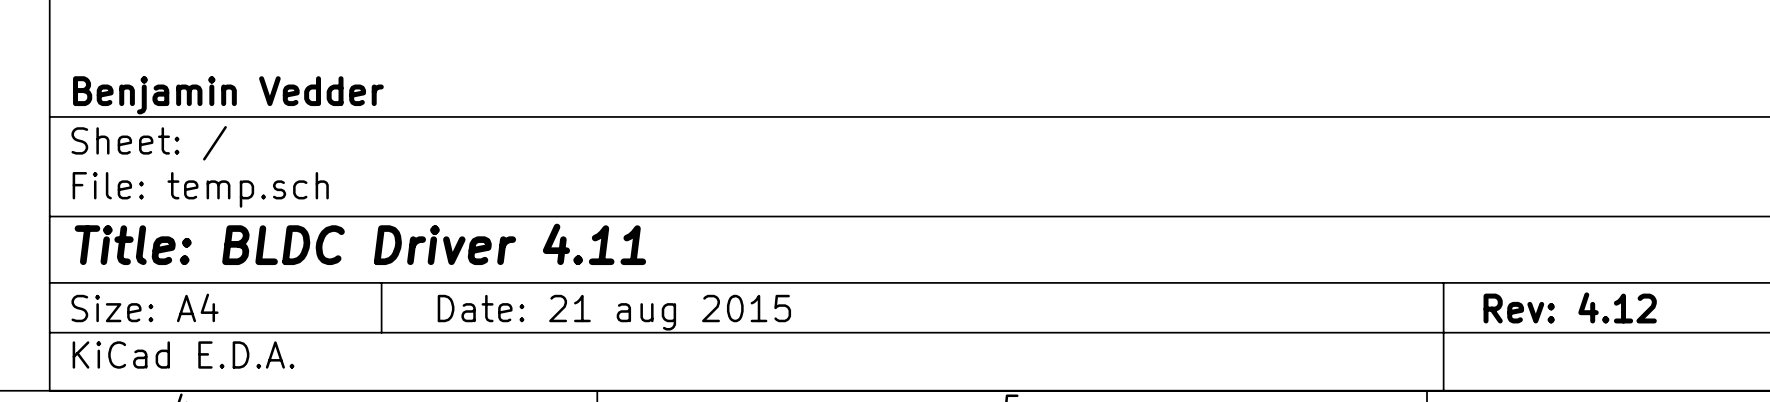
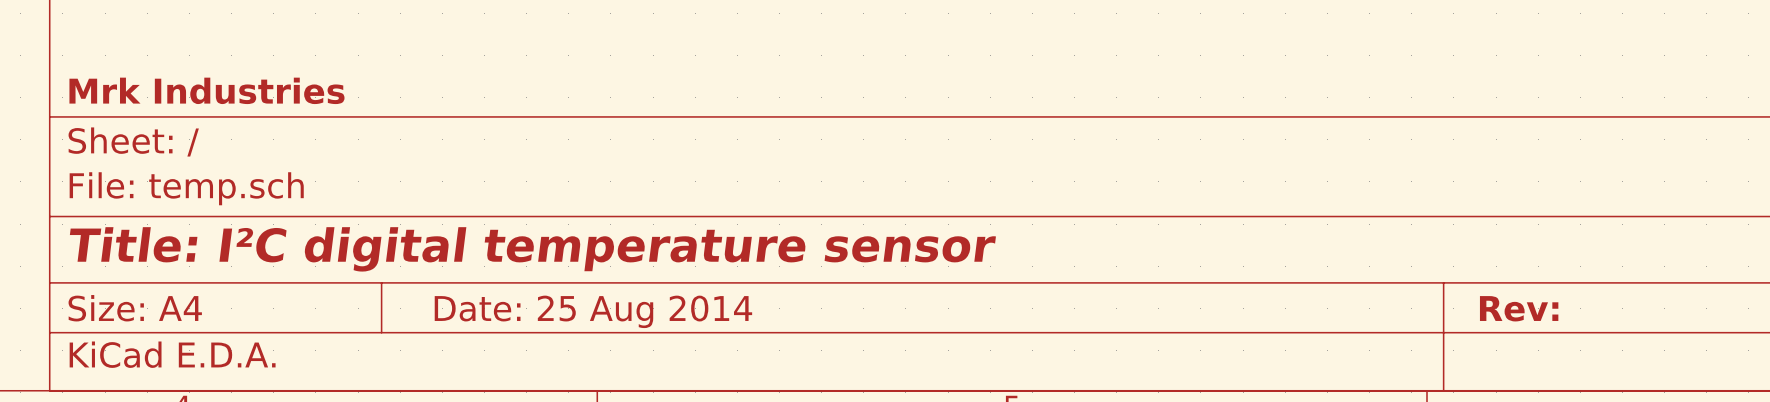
title block: Benjamin Vedder (228, 95) -> Mrk Industries (206, 90)
title block: Title: BLDC Driver 4.11 (360, 244) -> Title: I²C digital temperature sensor (532, 249)
title block: Rev: 4.12 (1570, 307) -> Rev: (1519, 308)
title block: Date: 21 aug 2015 (614, 312) -> Date: 25 Aug 2014 (593, 311)

